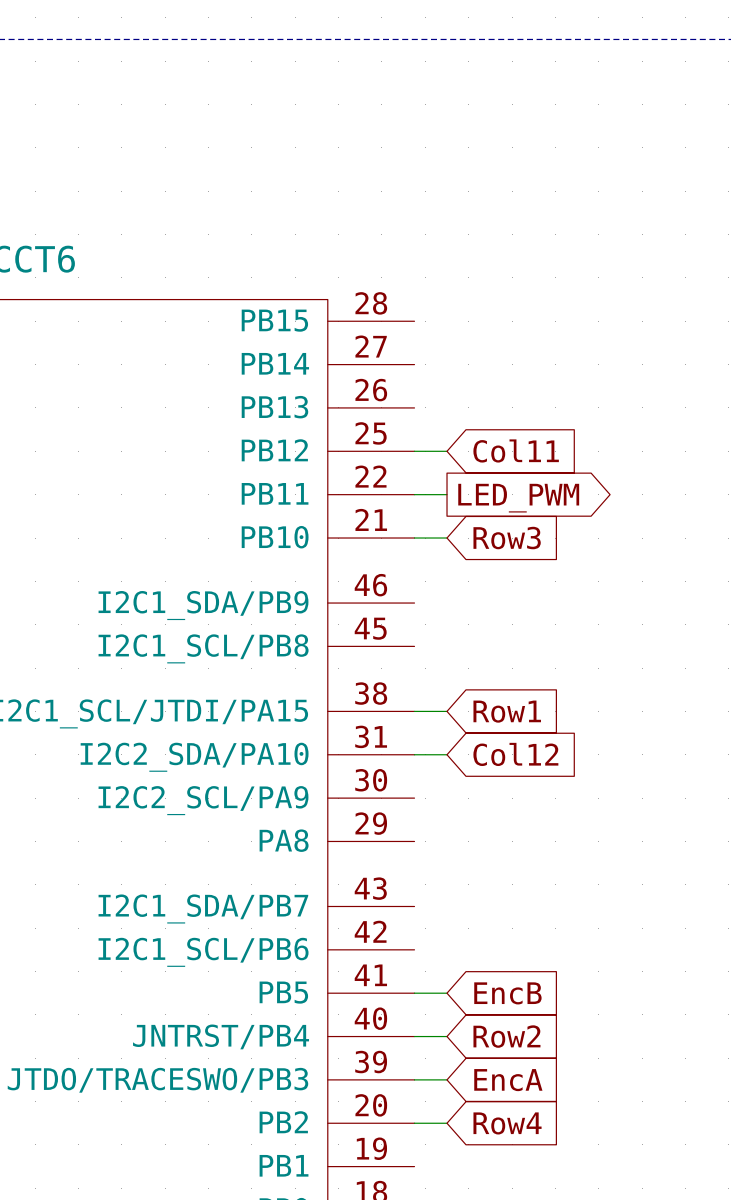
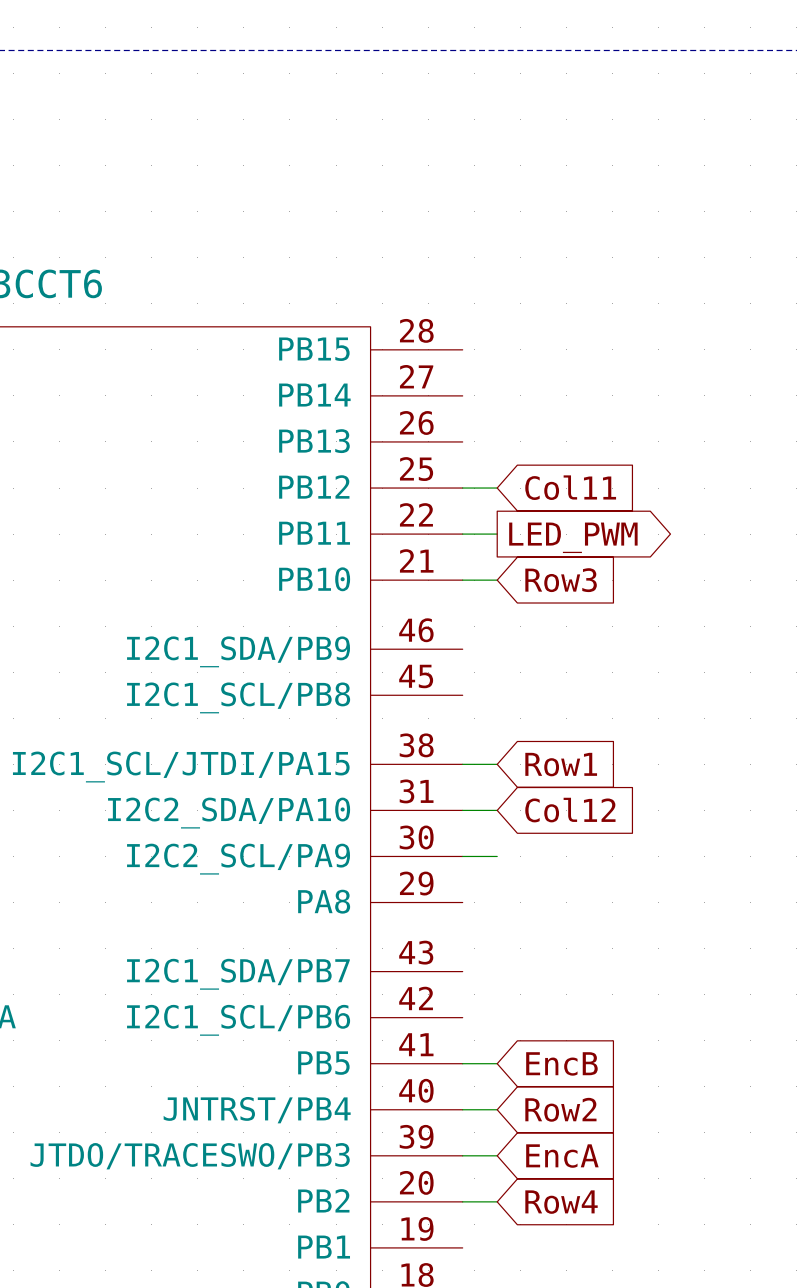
wire: none -> (462, 856) (497, 856)

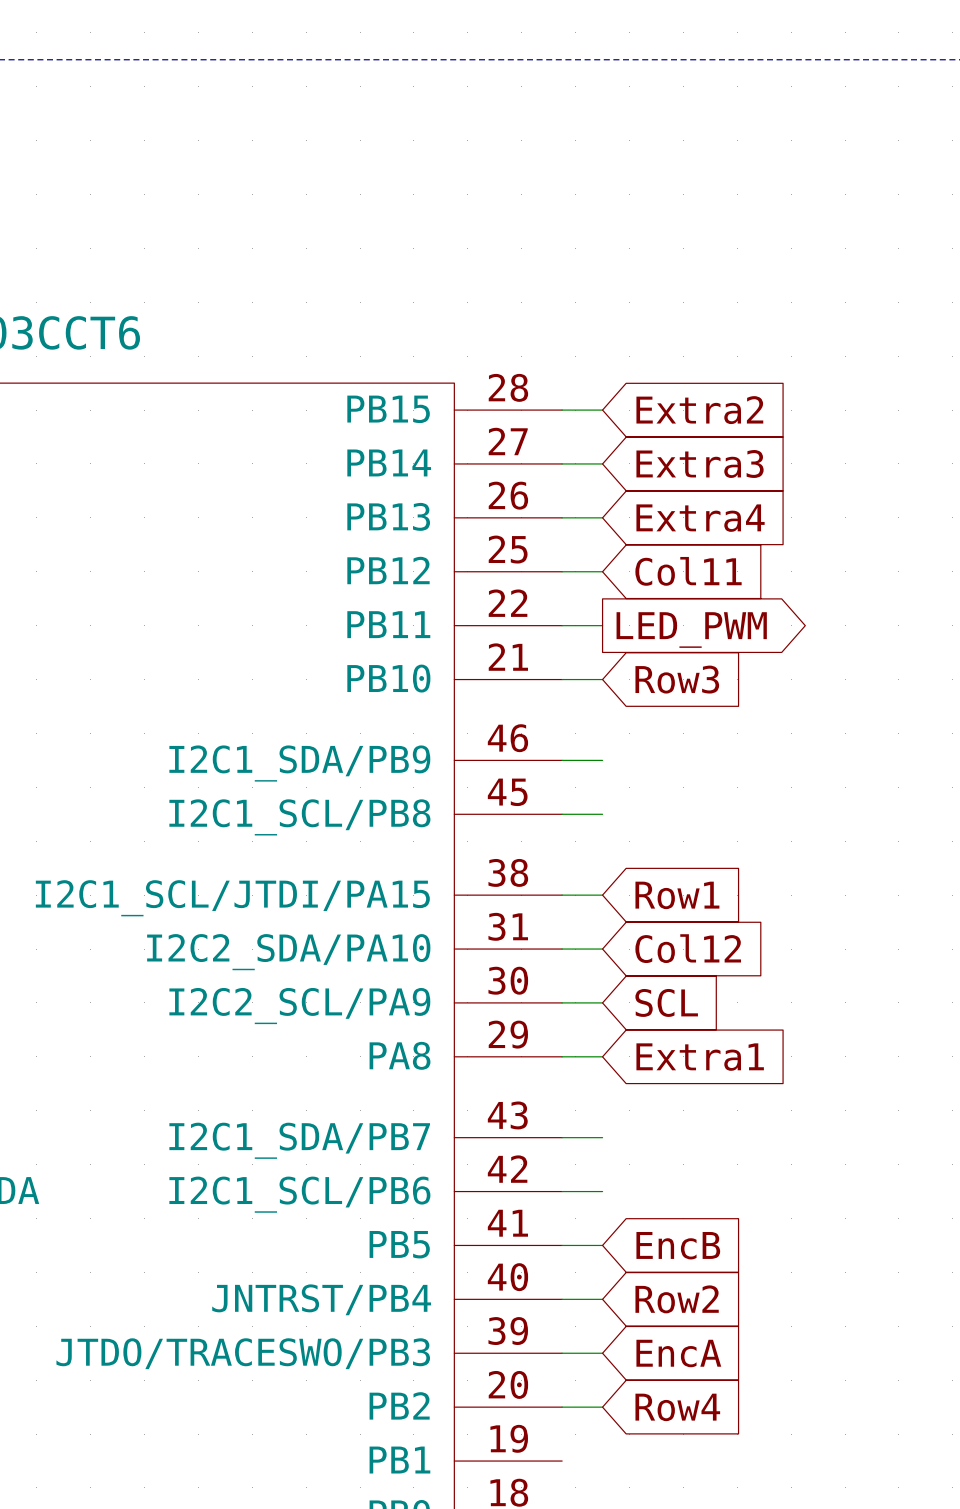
wire: none -> (562, 410) (602, 410)
global label: none -> Extra2 (699, 410)
wire: none -> (562, 463) (602, 463)
global label: none -> Extra3 (700, 463)
wire: none -> (562, 517) (602, 517)
global label: none -> Extra4 (700, 518)
wire: none -> (562, 760) (602, 760)
wire: none -> (562, 814) (602, 814)
global label: none -> SCL (666, 1002)
wire: none -> (562, 1056) (602, 1056)
global label: none -> Extra1 (700, 1057)
wire: none -> (562, 1137) (602, 1137)
wire: none -> (562, 1191) (602, 1191)

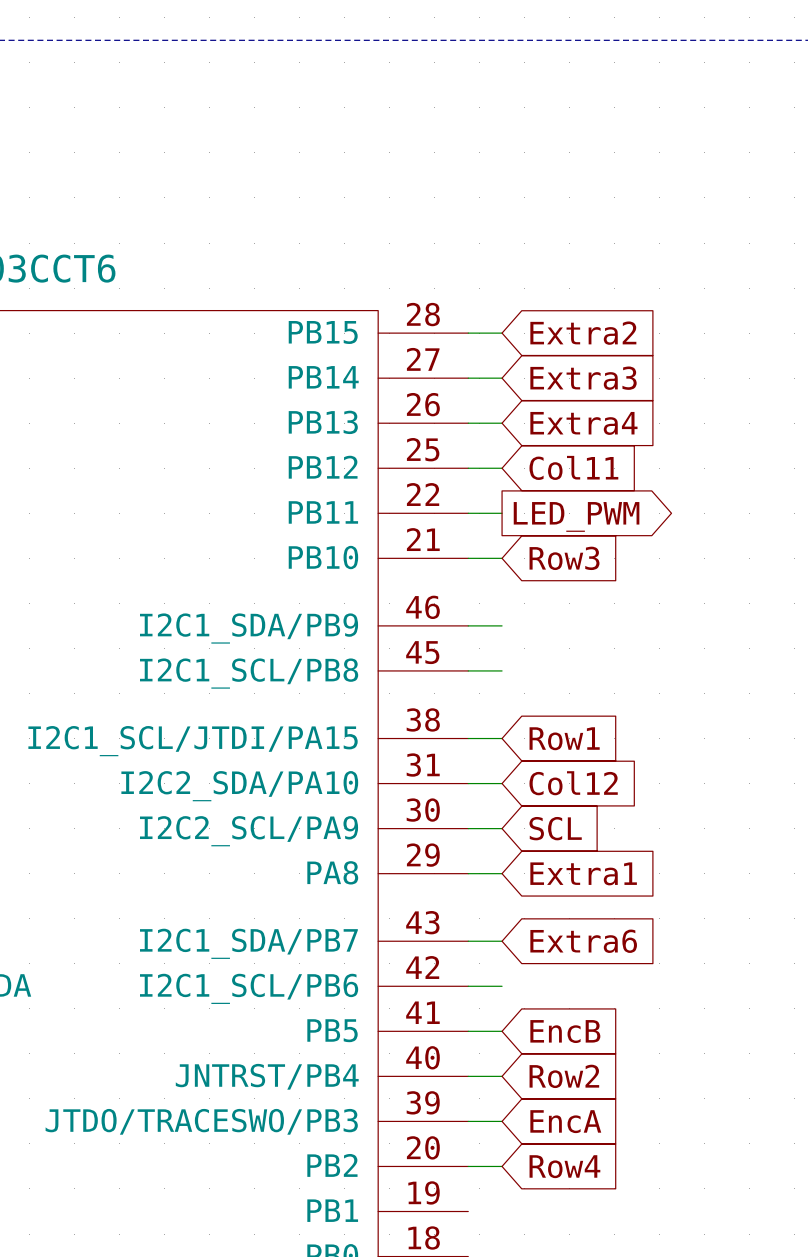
global label: none -> Extra6 (583, 941)

